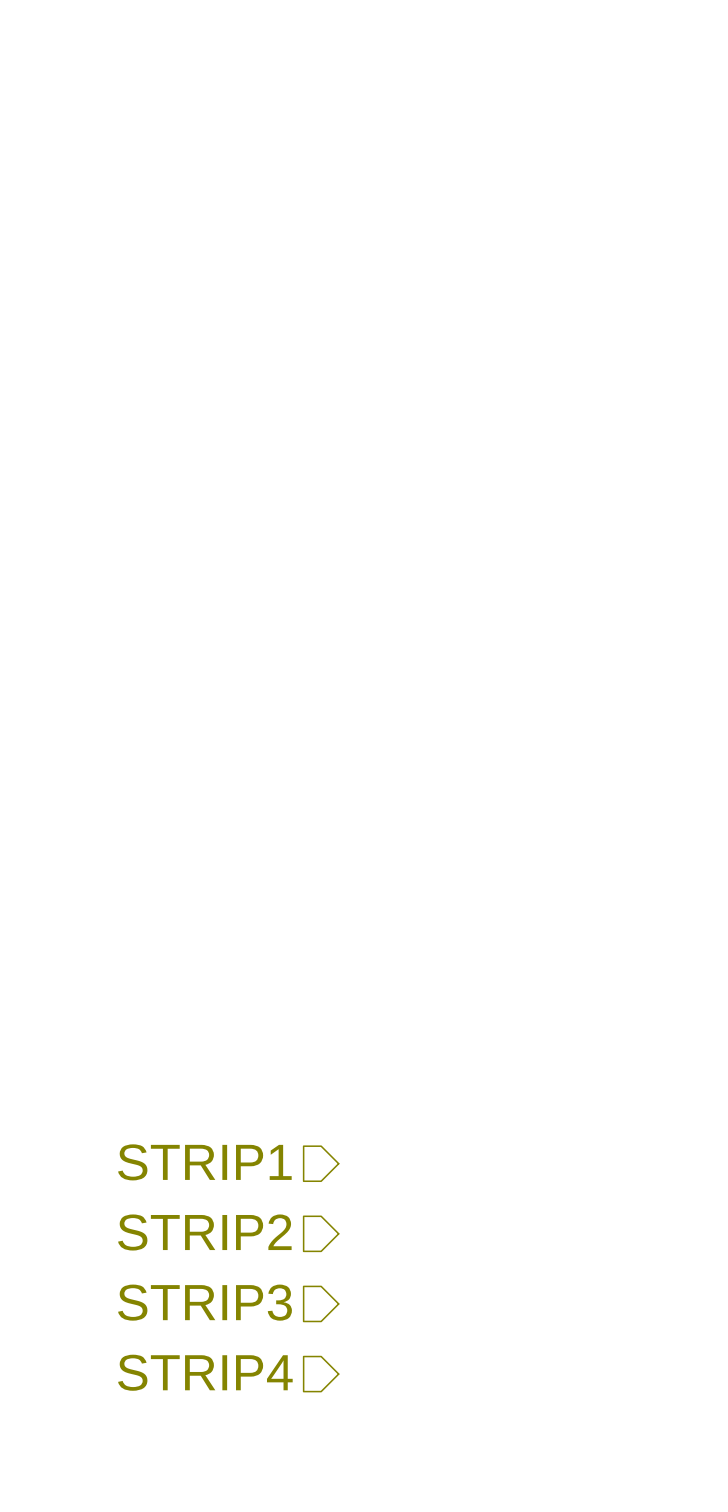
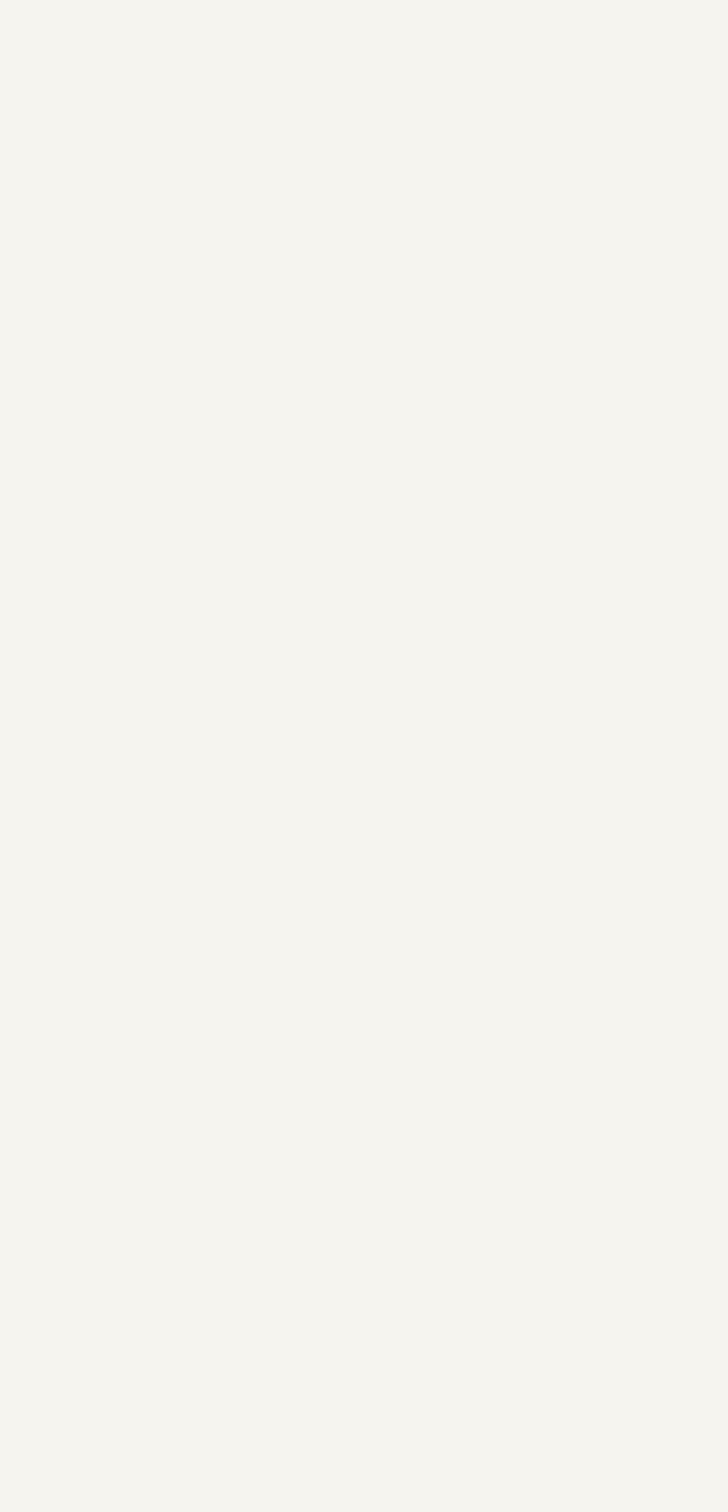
hierarchical label: STRIP1 (204, 1162) -> none
hierarchical label: STRIP2 (204, 1232) -> none
hierarchical label: STRIP3 (204, 1302) -> none
hierarchical label: STRIP4 (205, 1372) -> none

